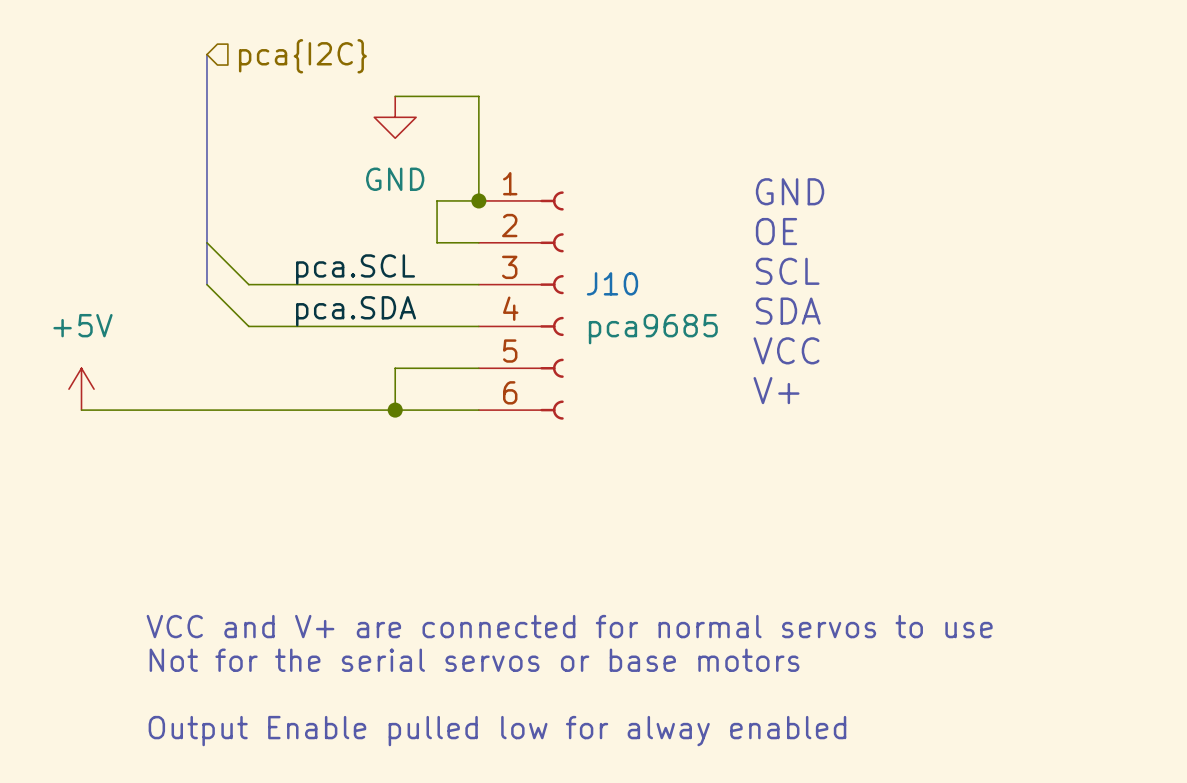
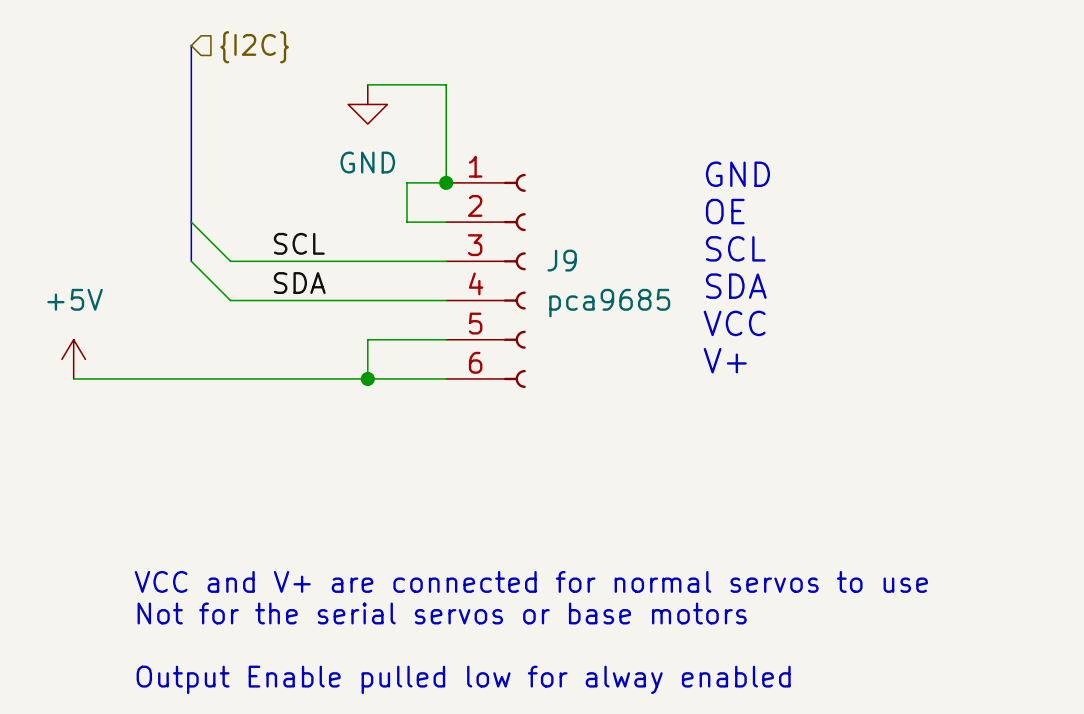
hierarchical label: pca{I2C} (302, 56) -> {I2C} (254, 47)
label: pca.SCL (355, 269) -> SCL (299, 243)
J10 name: J10 (612, 283) -> J9 (562, 260)
label: pca.SDA (356, 311) -> SDA (299, 283)

